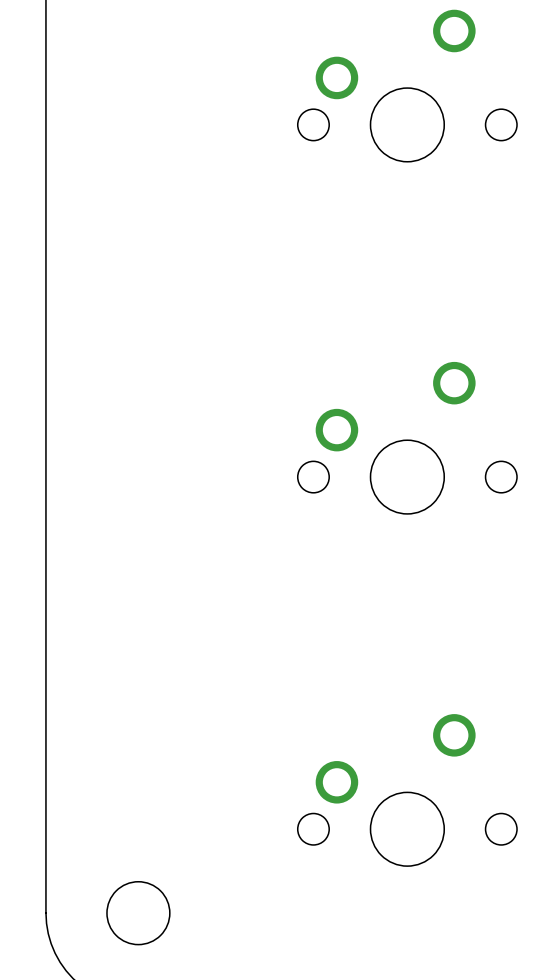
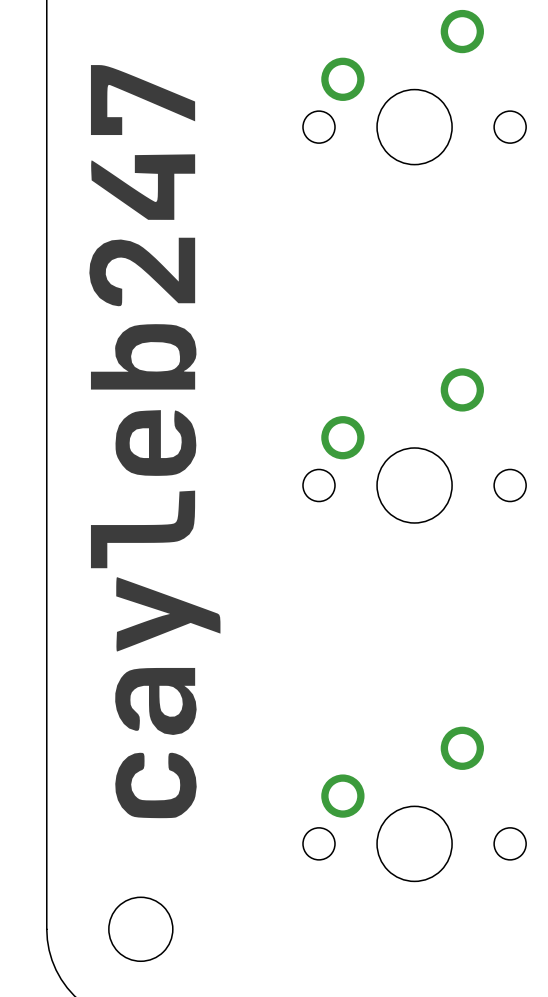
drawing: none -> [89, 65, 221, 819]

